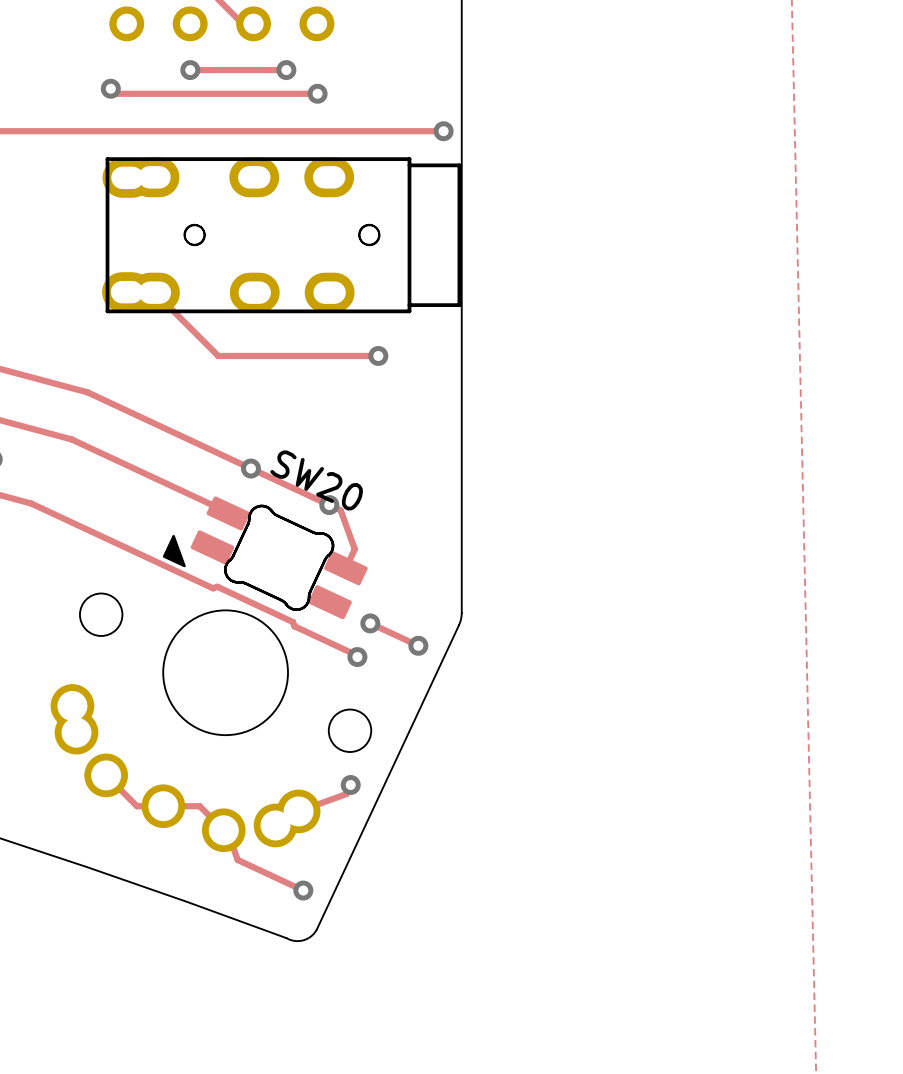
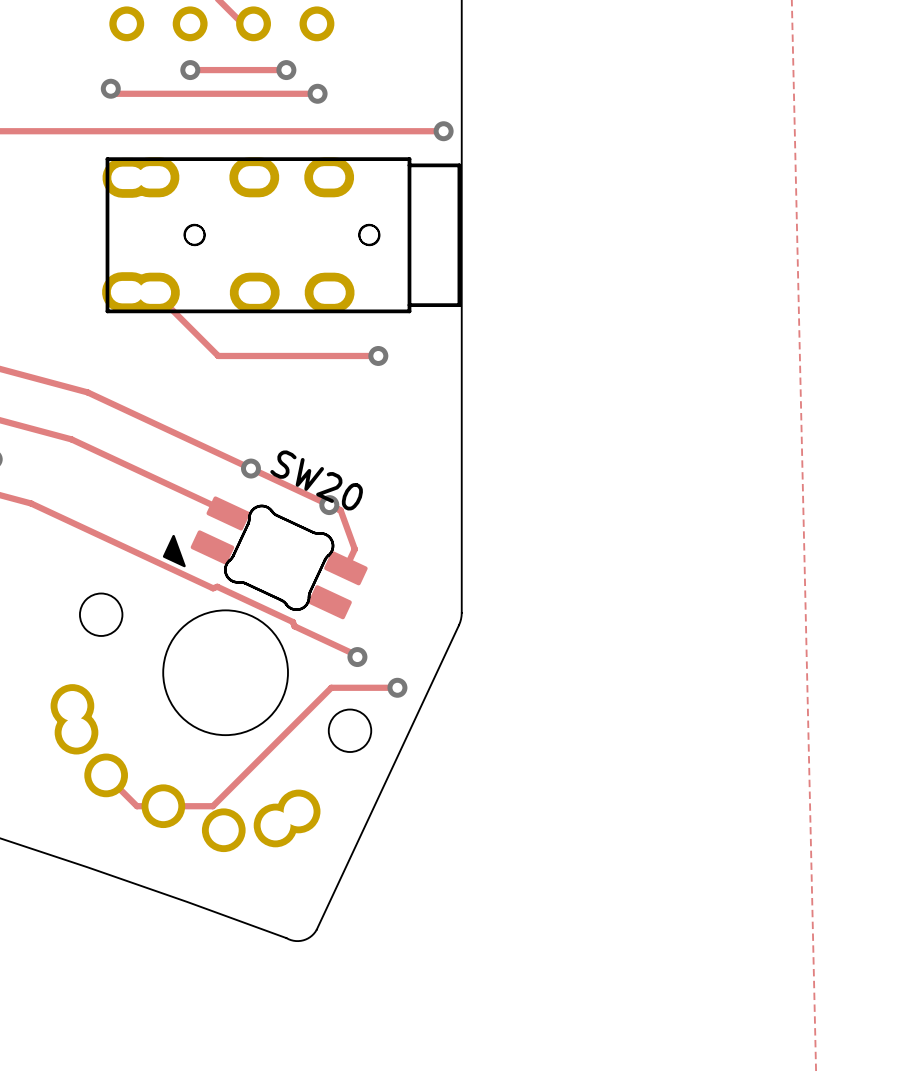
track: (370, 623) (418, 645) -> none
via: (370, 623) -> none
via: (418, 645) -> none
via: none -> (397, 687)
track: (350, 784) (346, 794) (298, 811) -> none
via: (350, 784) -> none
track: (199, 806) (227, 832) (237, 859) (303, 890) -> (199, 806) (212, 806) (331, 687) (397, 687)
via: (303, 890) -> none

